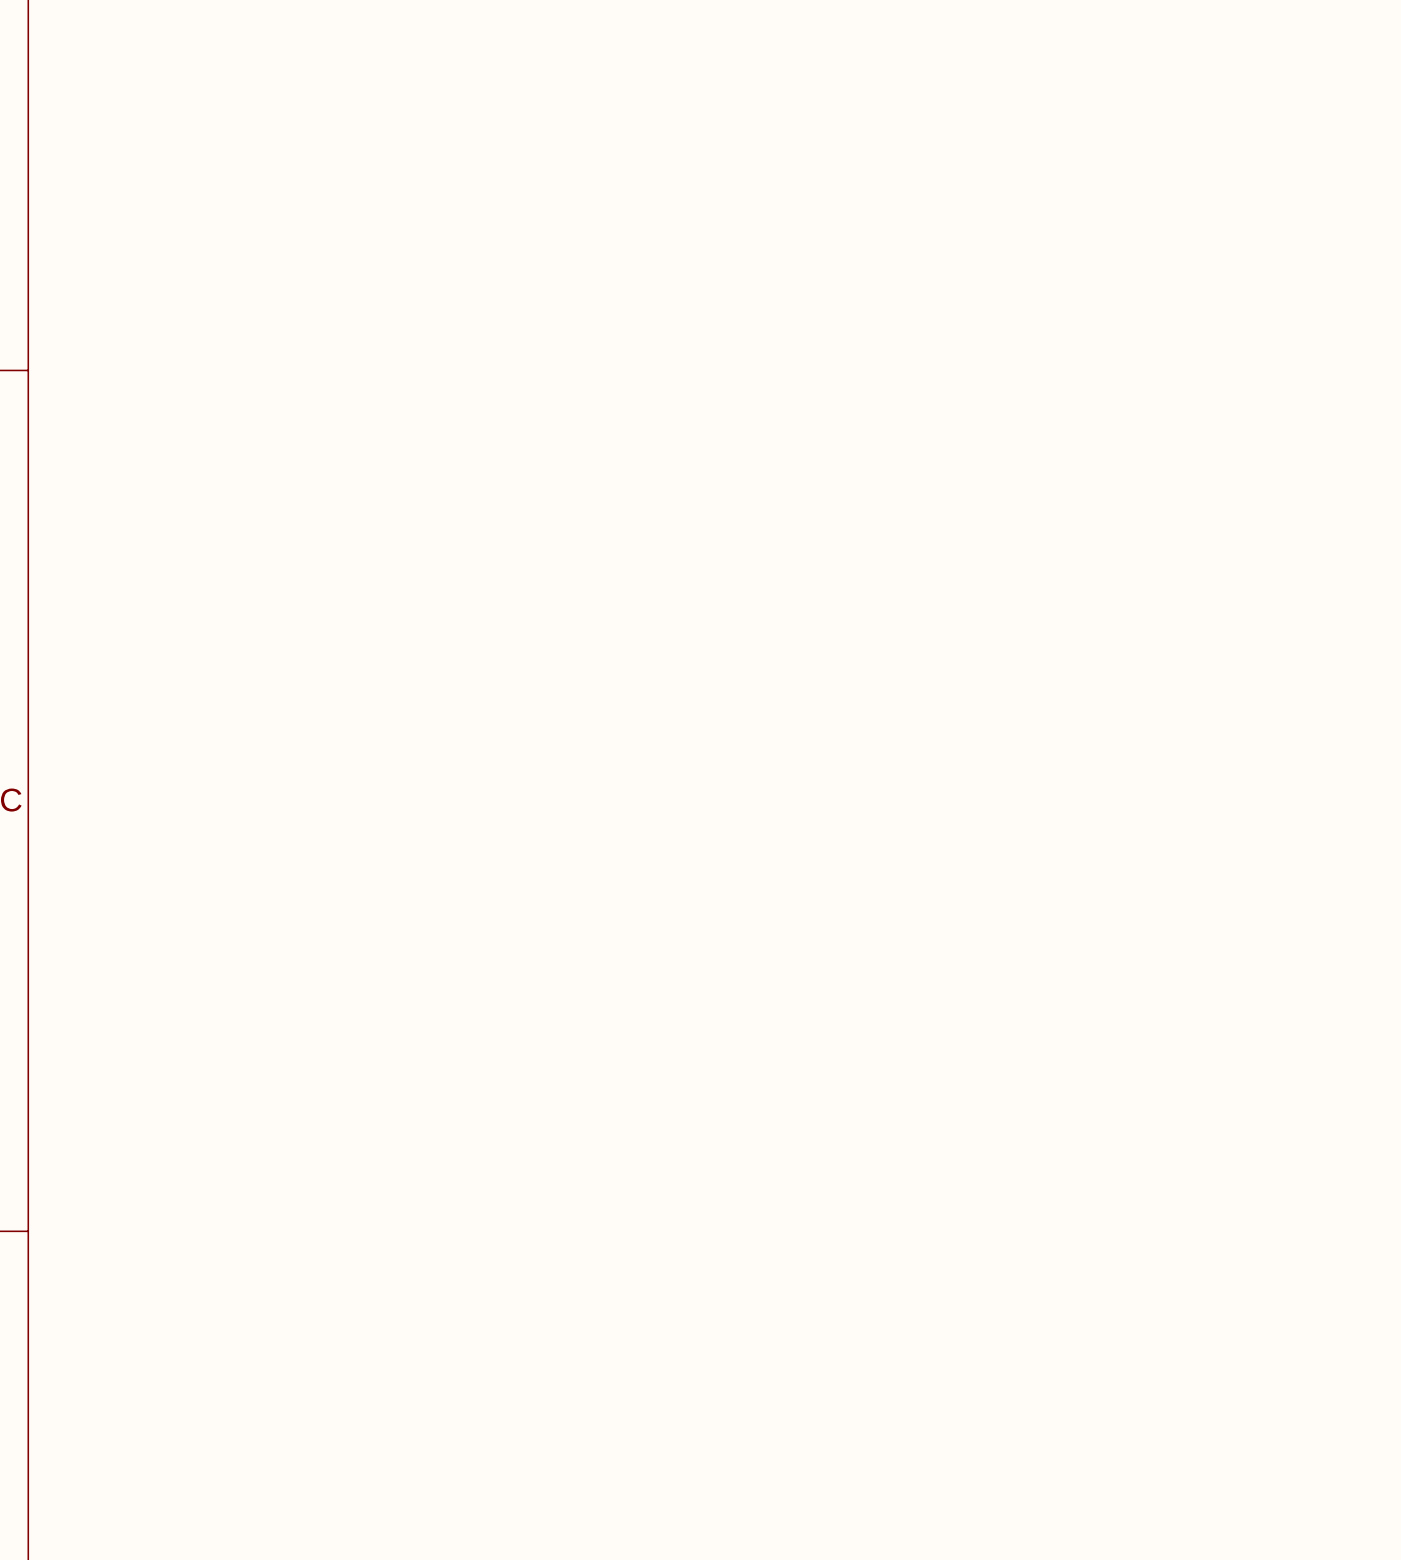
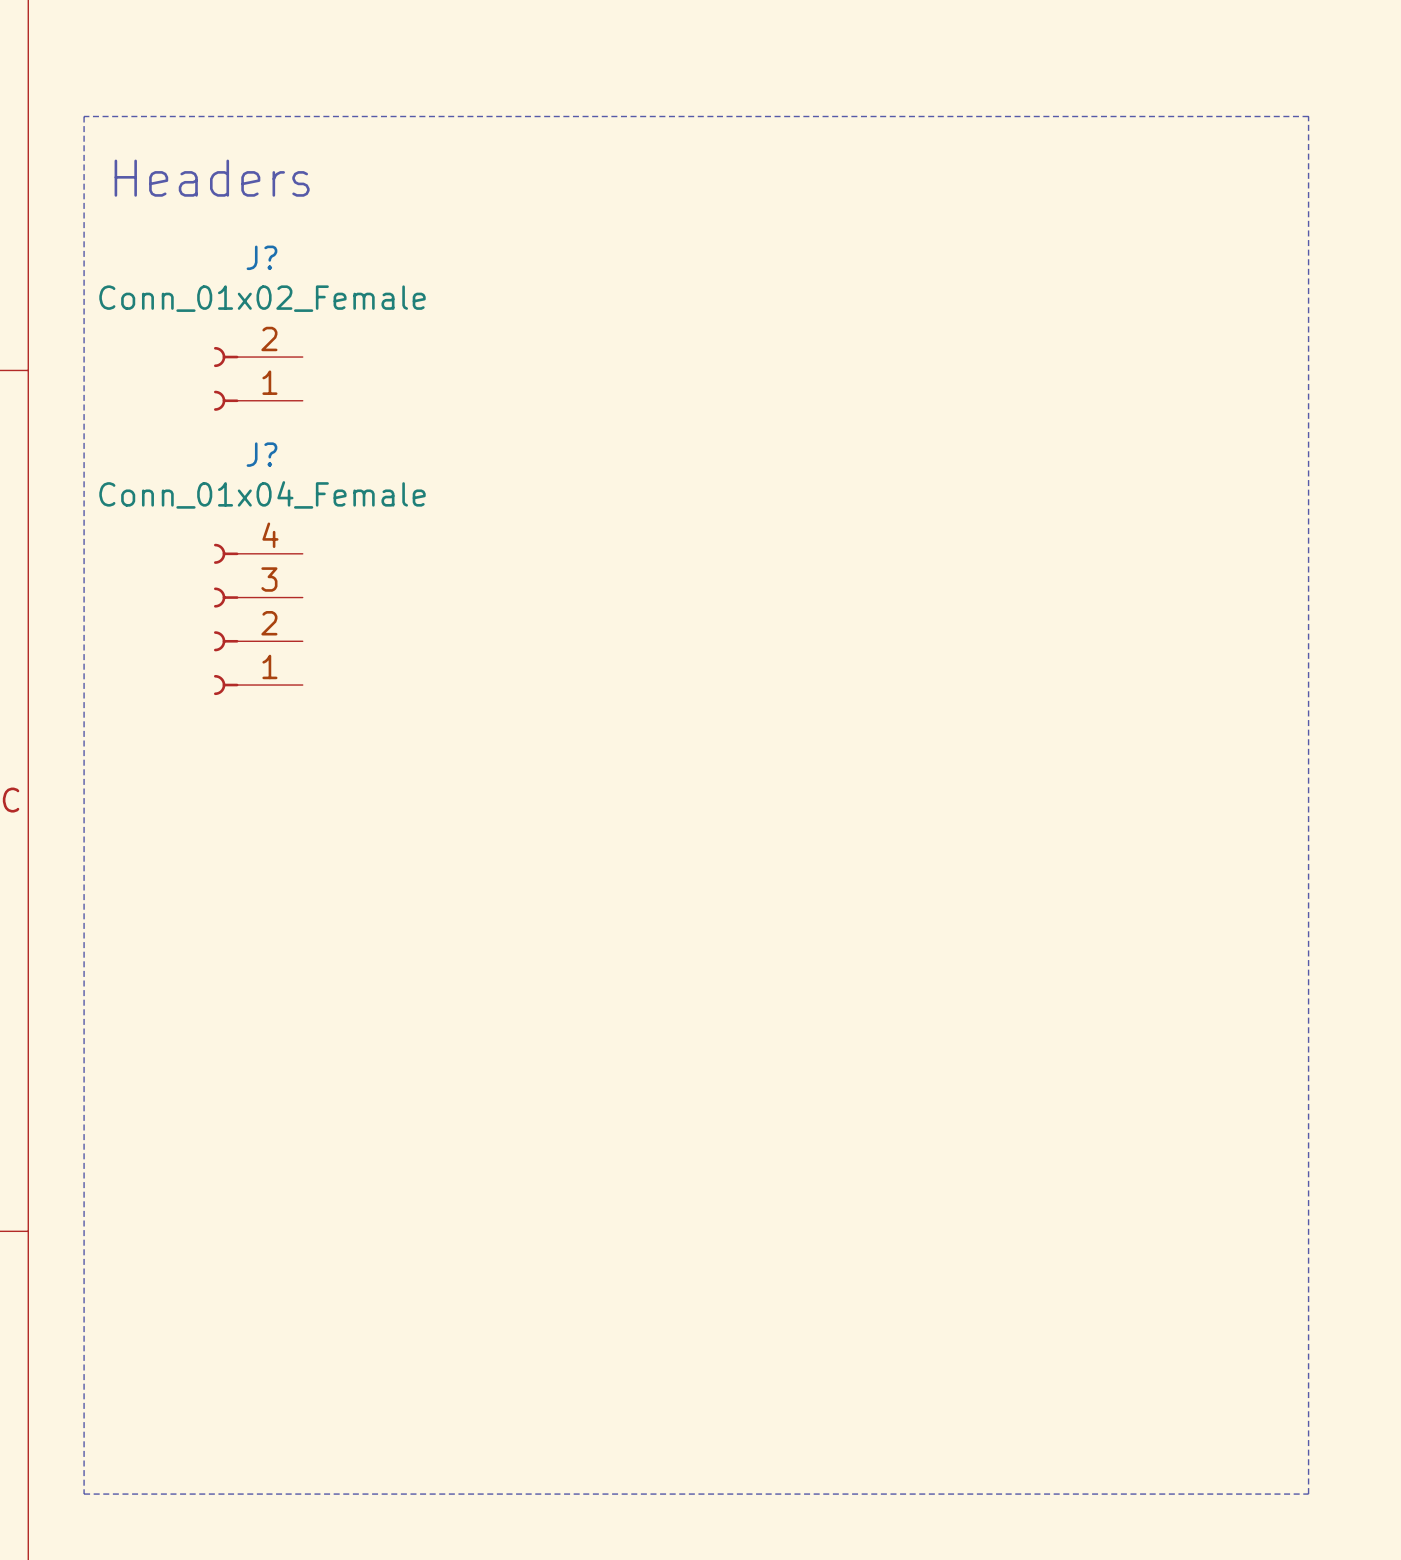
line: none -> (84, 116) (84, 1494) (1308, 1494) (1308, 116) (84, 116)
text: none -> Headers (212, 178)
J?: none -> Conn_01x02_Female (258, 378)
J?: none -> Conn_01x04_Female (258, 619)

